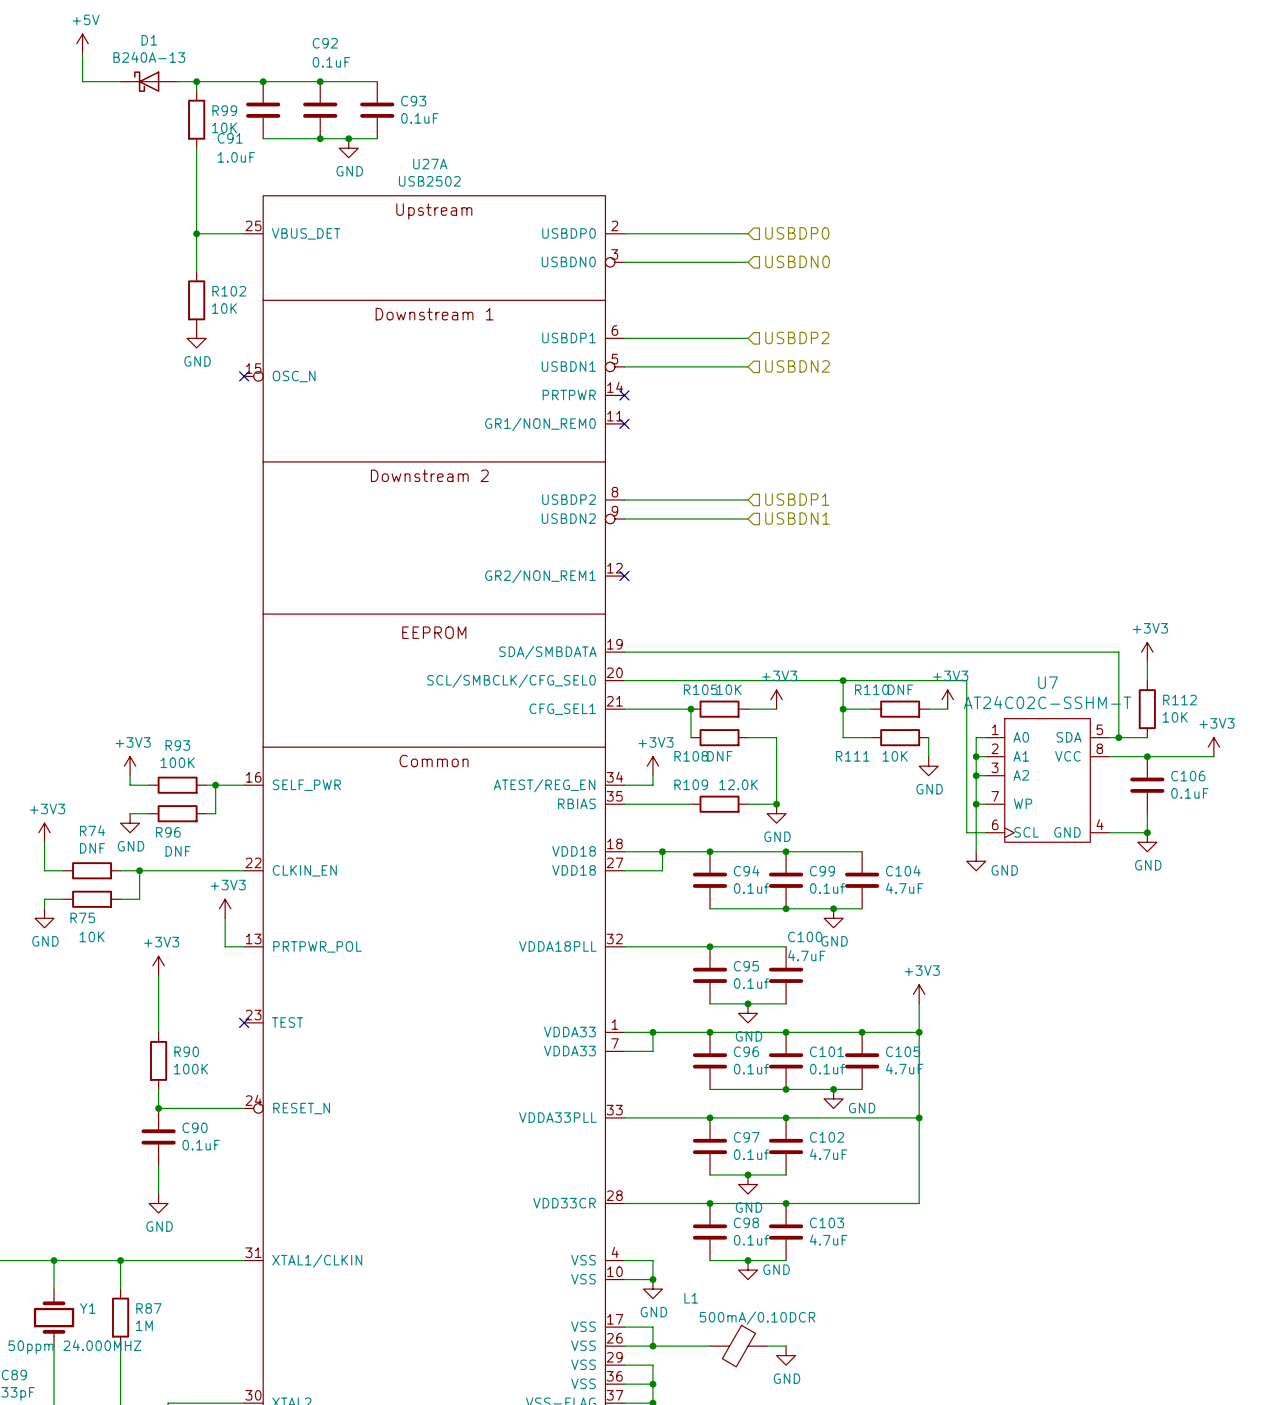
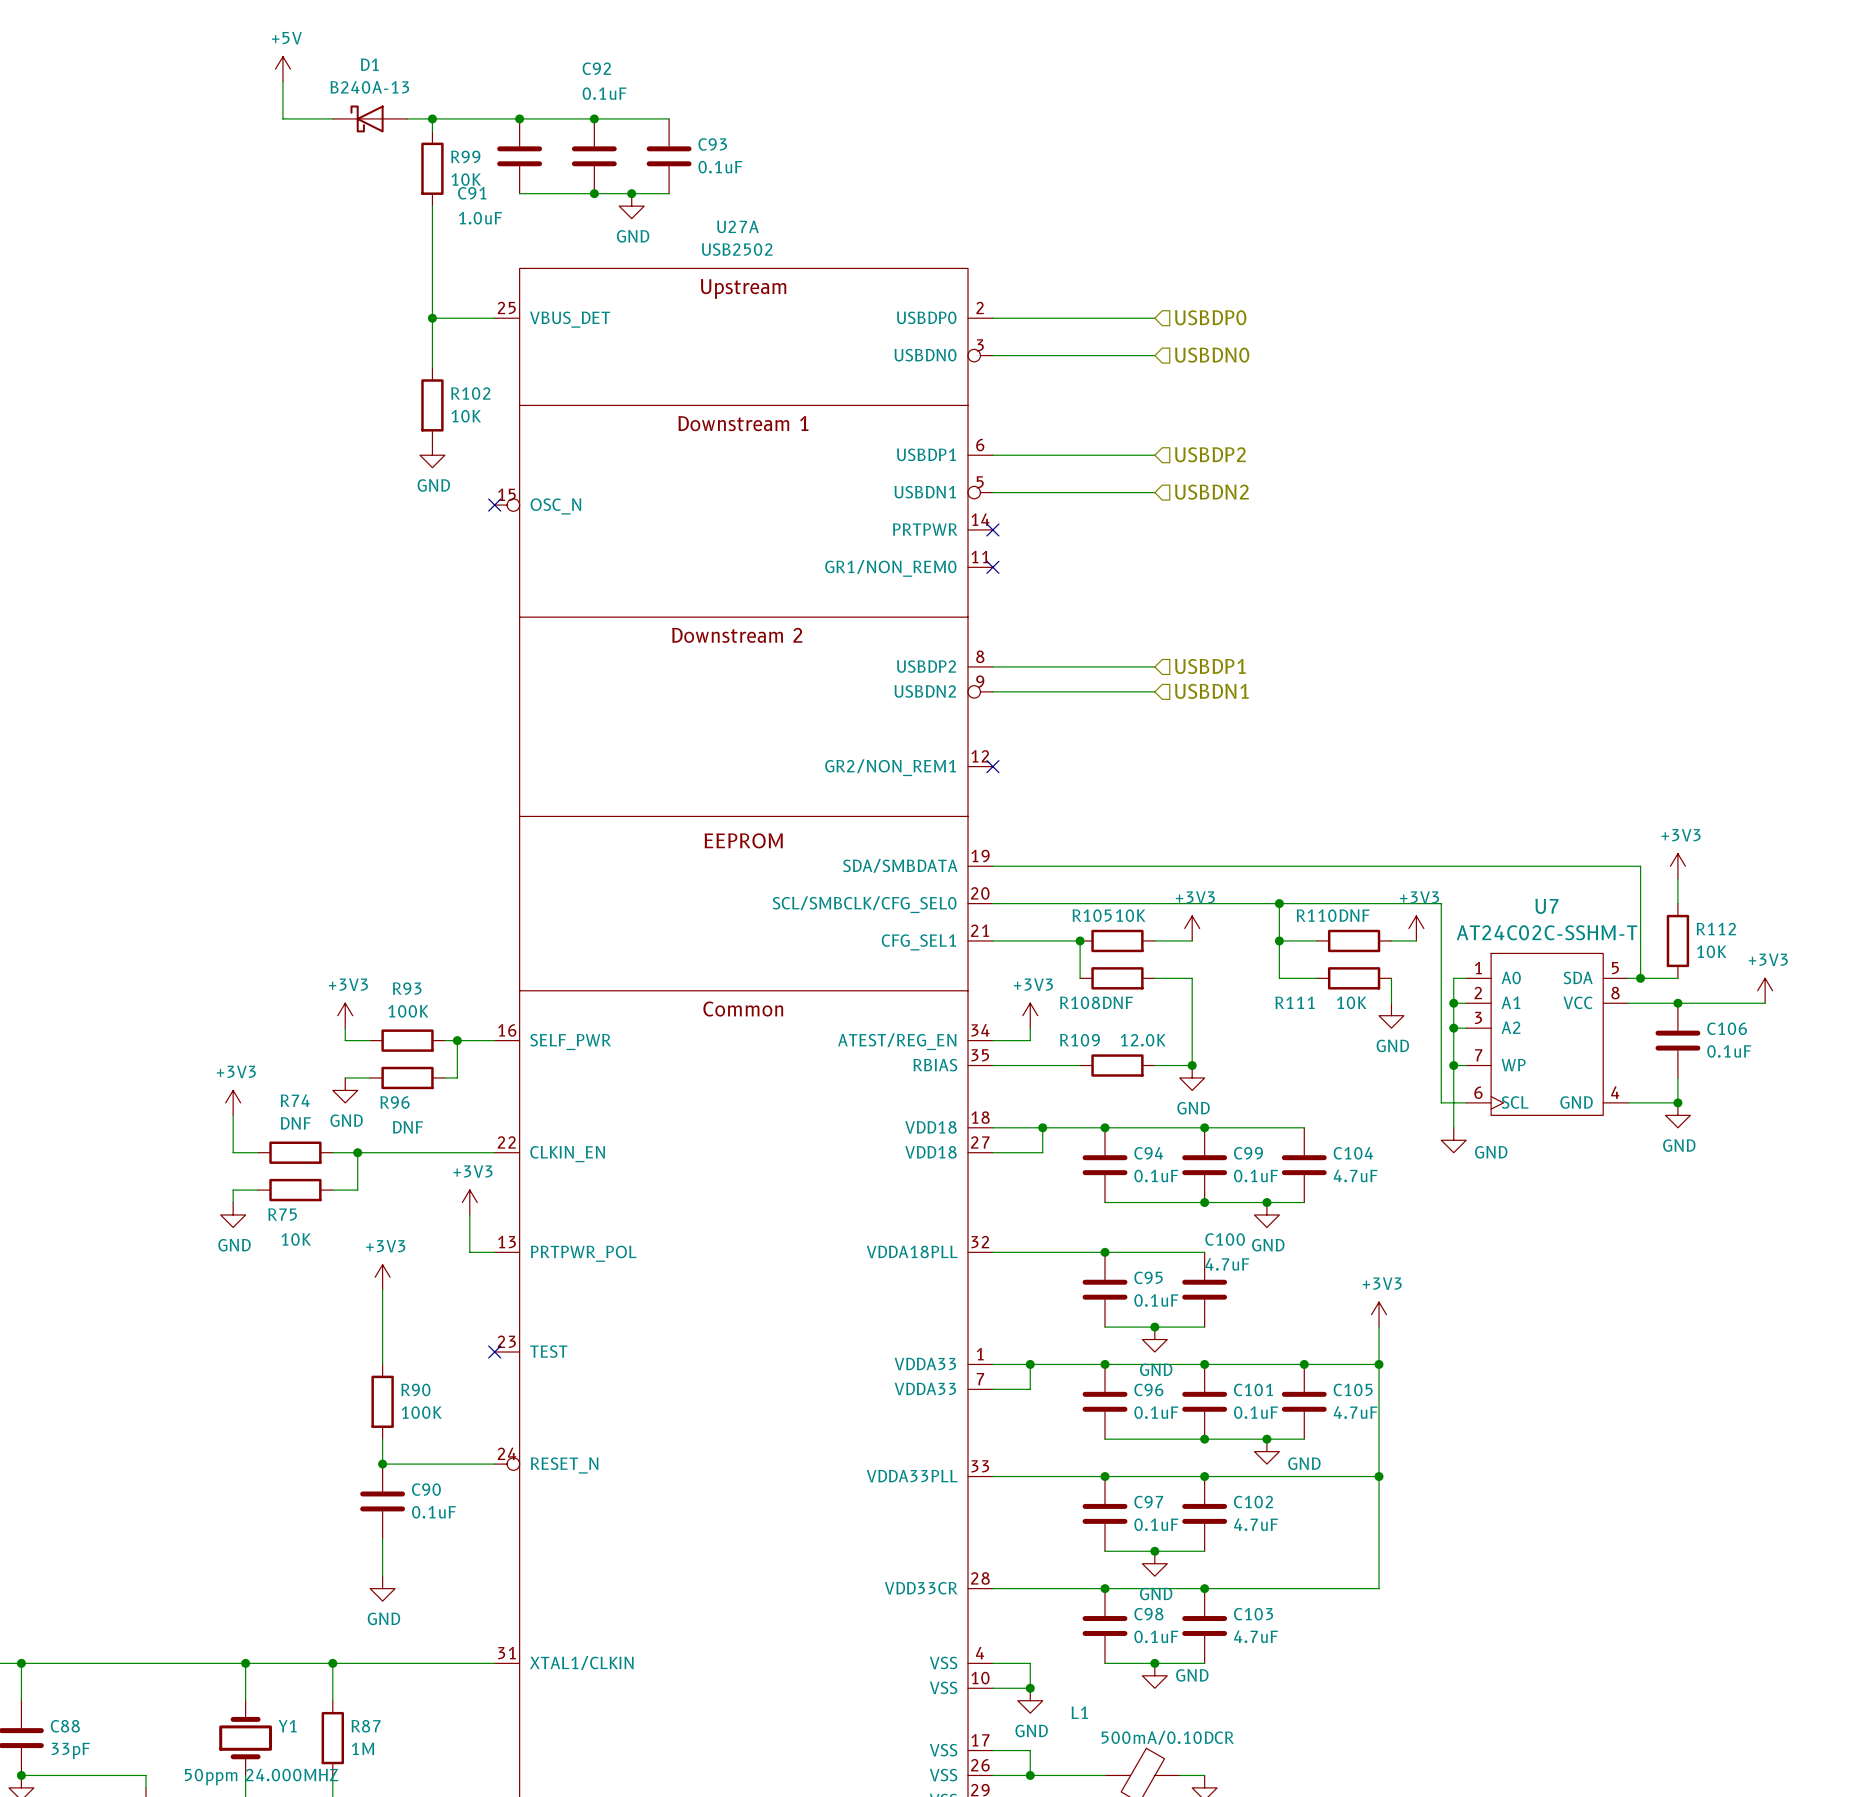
C94 value: 0.1uf (751, 888) -> 0.1uF (1156, 1175)
C99 value: 0.1uf (827, 888) -> 0.1uF (1255, 1175)
C95 value: 0.1uf (751, 983) -> 0.1uF (1156, 1300)
C96 value: 0.1uf (751, 1069) -> 0.1uF (1156, 1412)
C101 value: 0.1uf (827, 1069) -> 0.1uF (1255, 1412)
C97 value: 0.1uf (751, 1154) -> 0.1uF (1156, 1524)
C98 value: 0.1uf (751, 1240) -> 0.1uF (1156, 1636)

